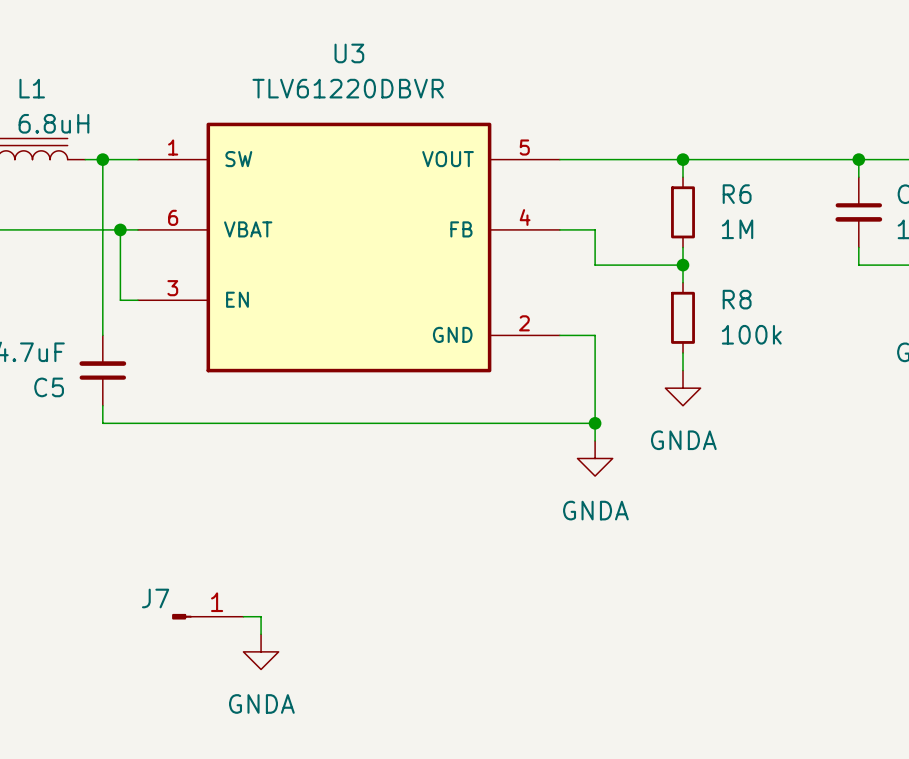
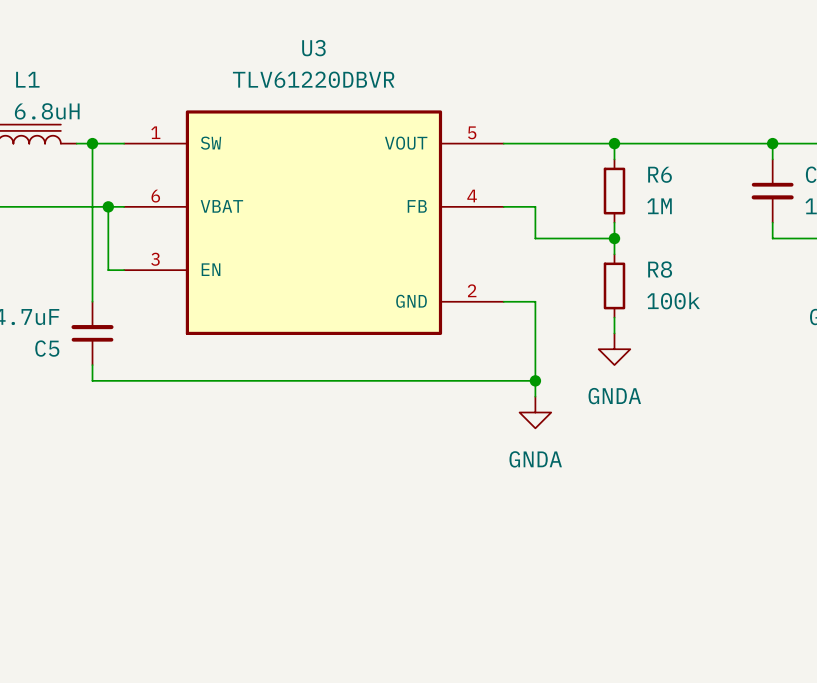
J7: (207, 616) -> none
wire: (243, 616) (261, 616) (261, 634) -> none
power symbol: GNDA (261, 651) -> none

